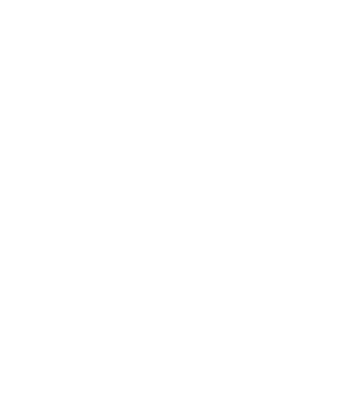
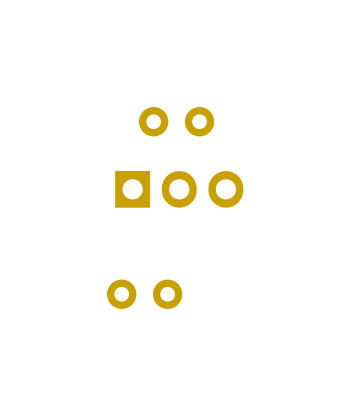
part: none -> (176, 121)
part: none -> (179, 189)
part: none -> (144, 294)

